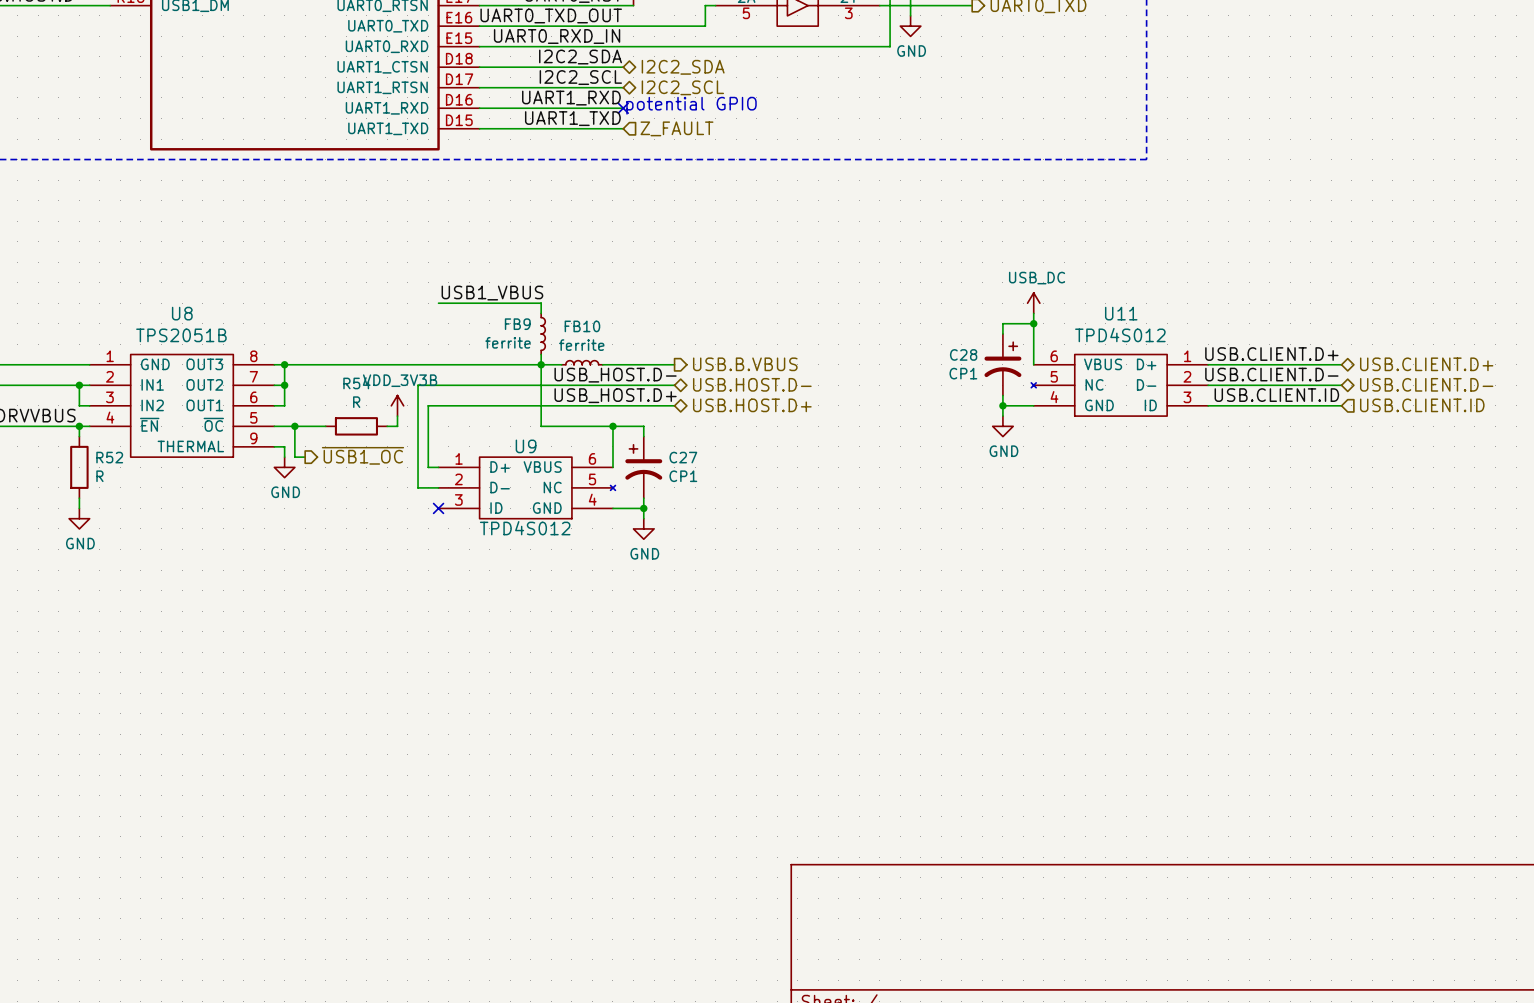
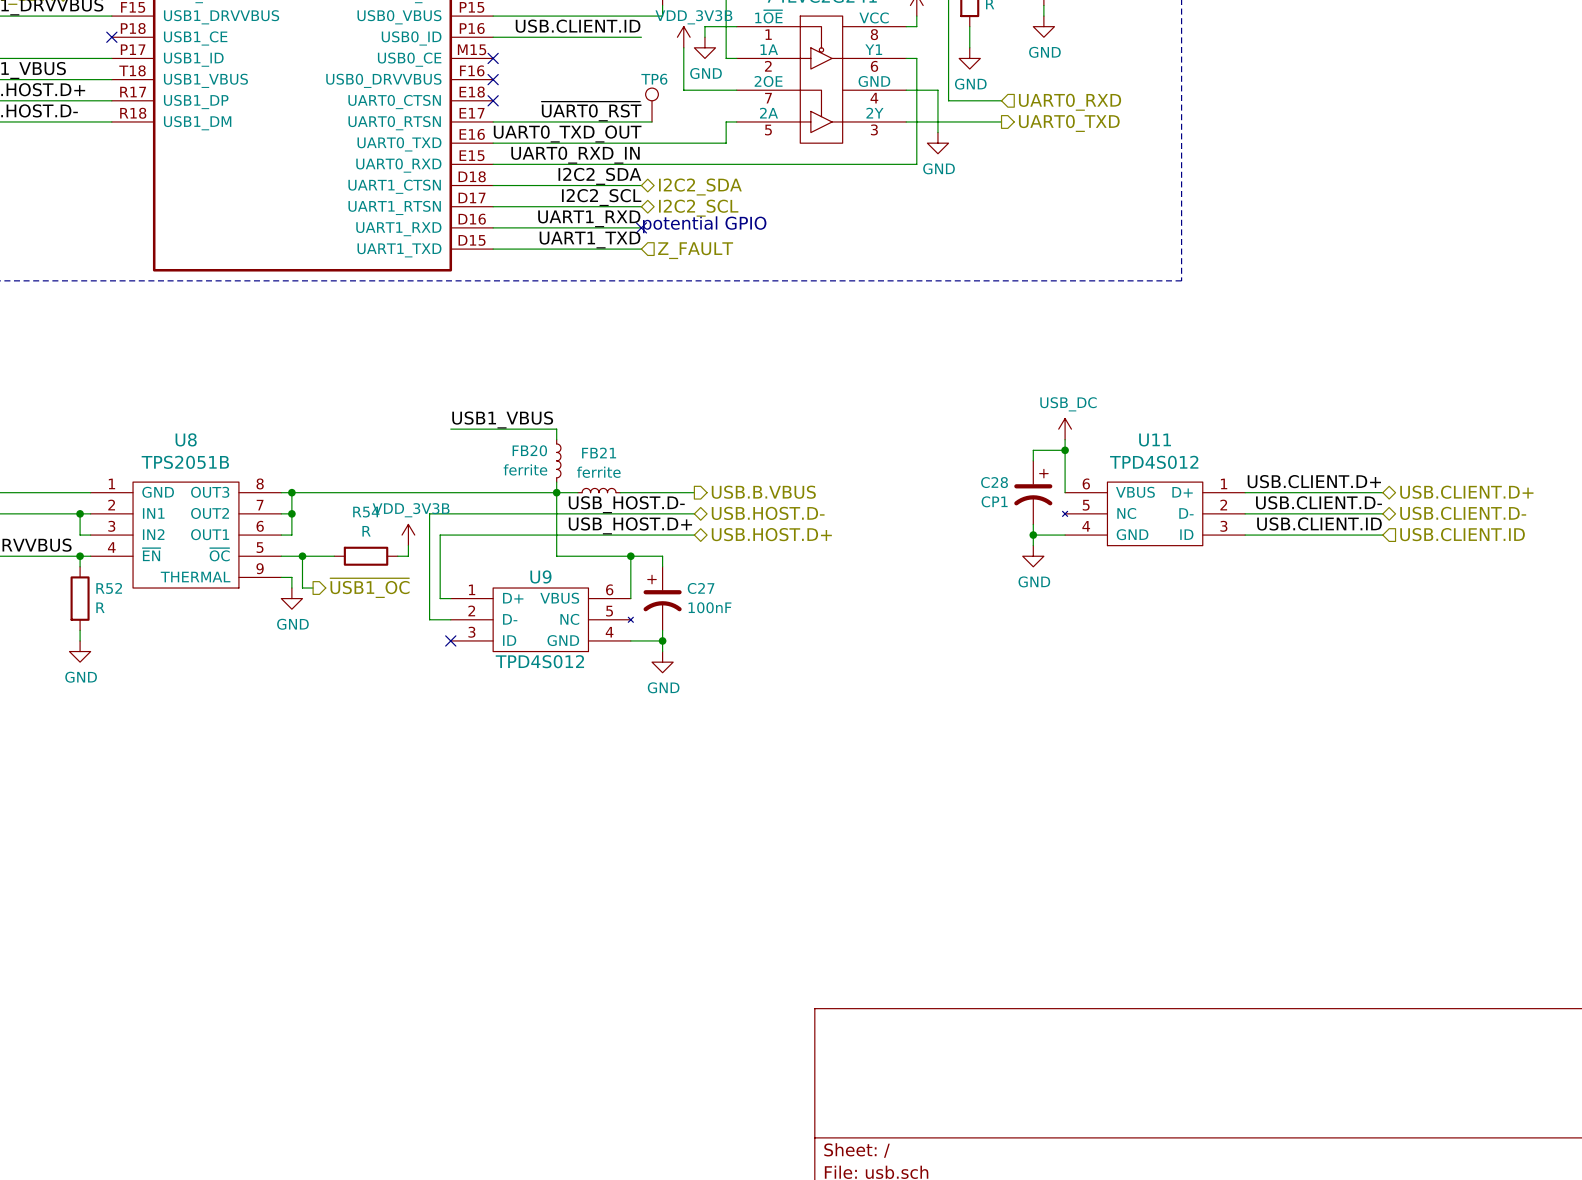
FB9 name: FB9 (517, 324) -> FB20 (529, 450)
FB10 name: FB10 (582, 326) -> FB21 (599, 453)
C27 value: CP1 (683, 476) -> 100nF (709, 607)

